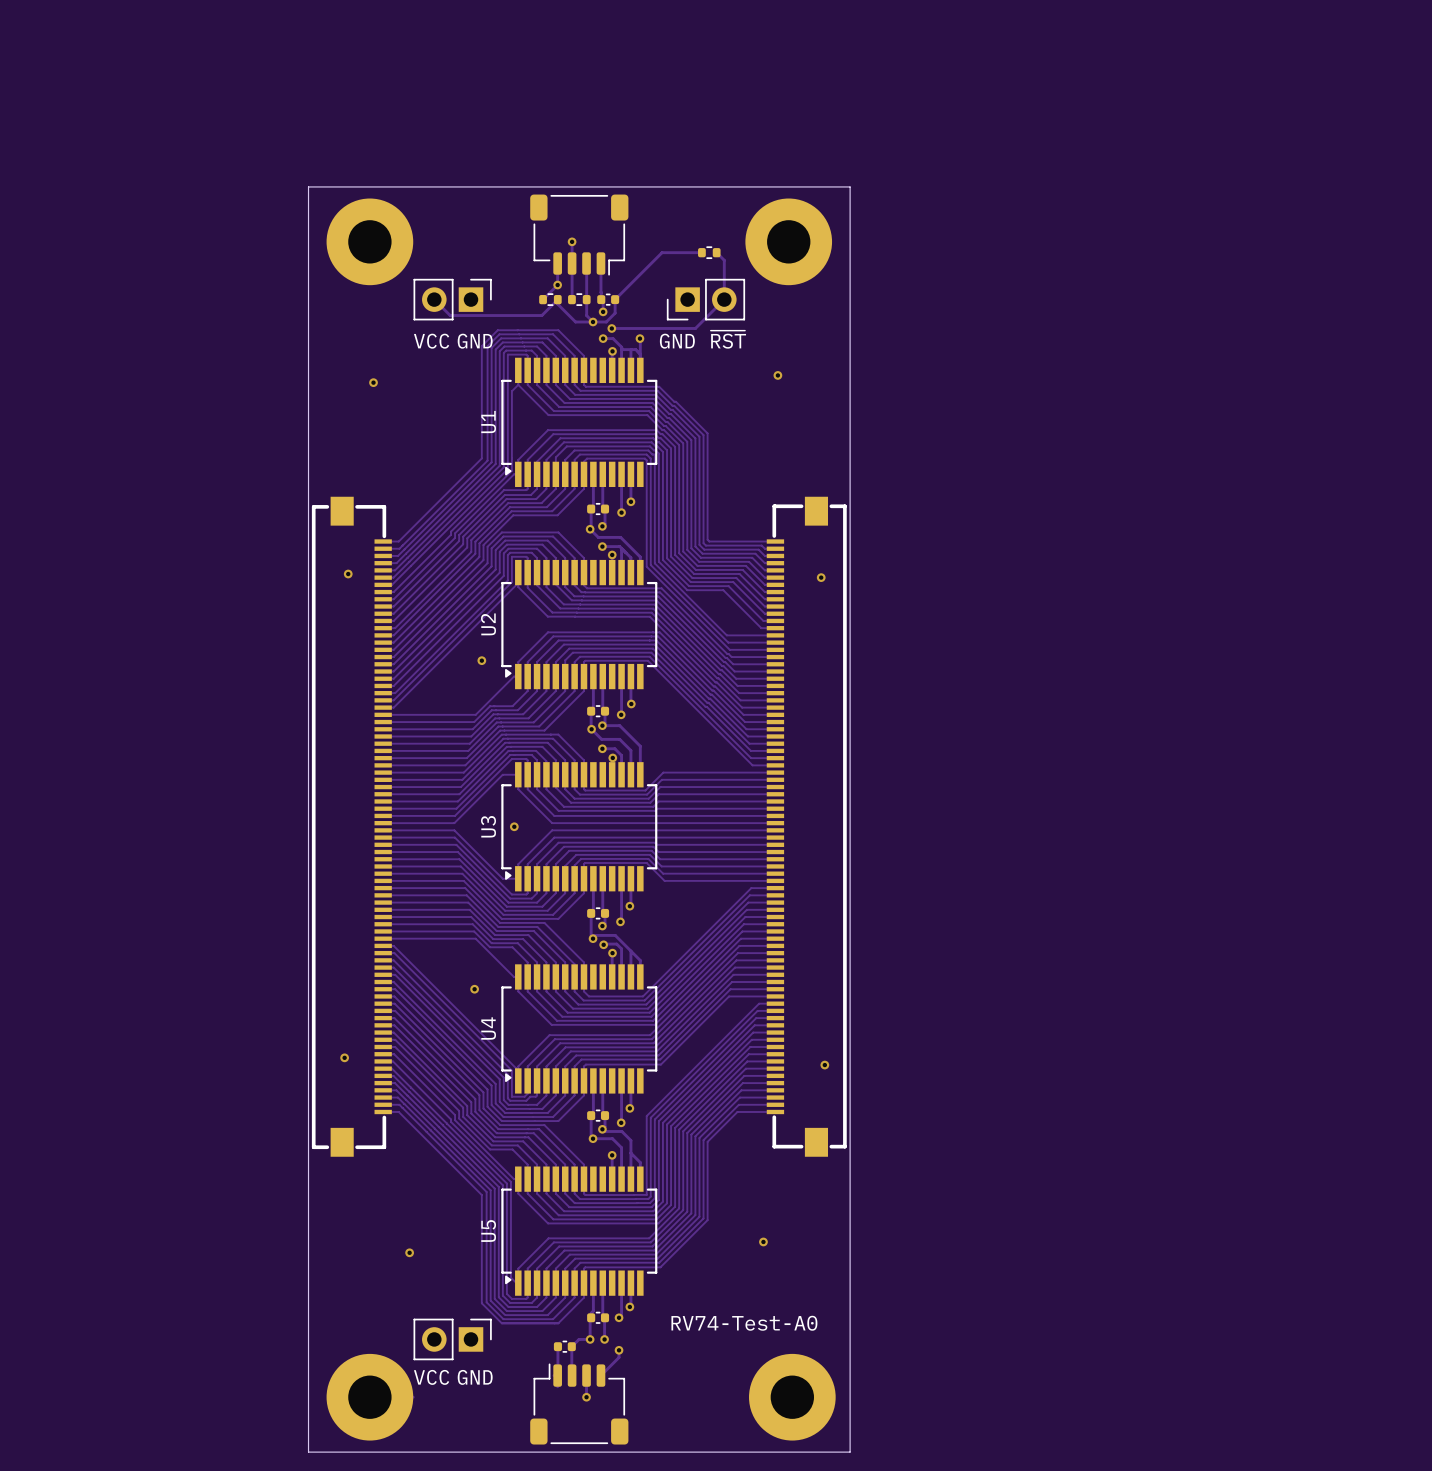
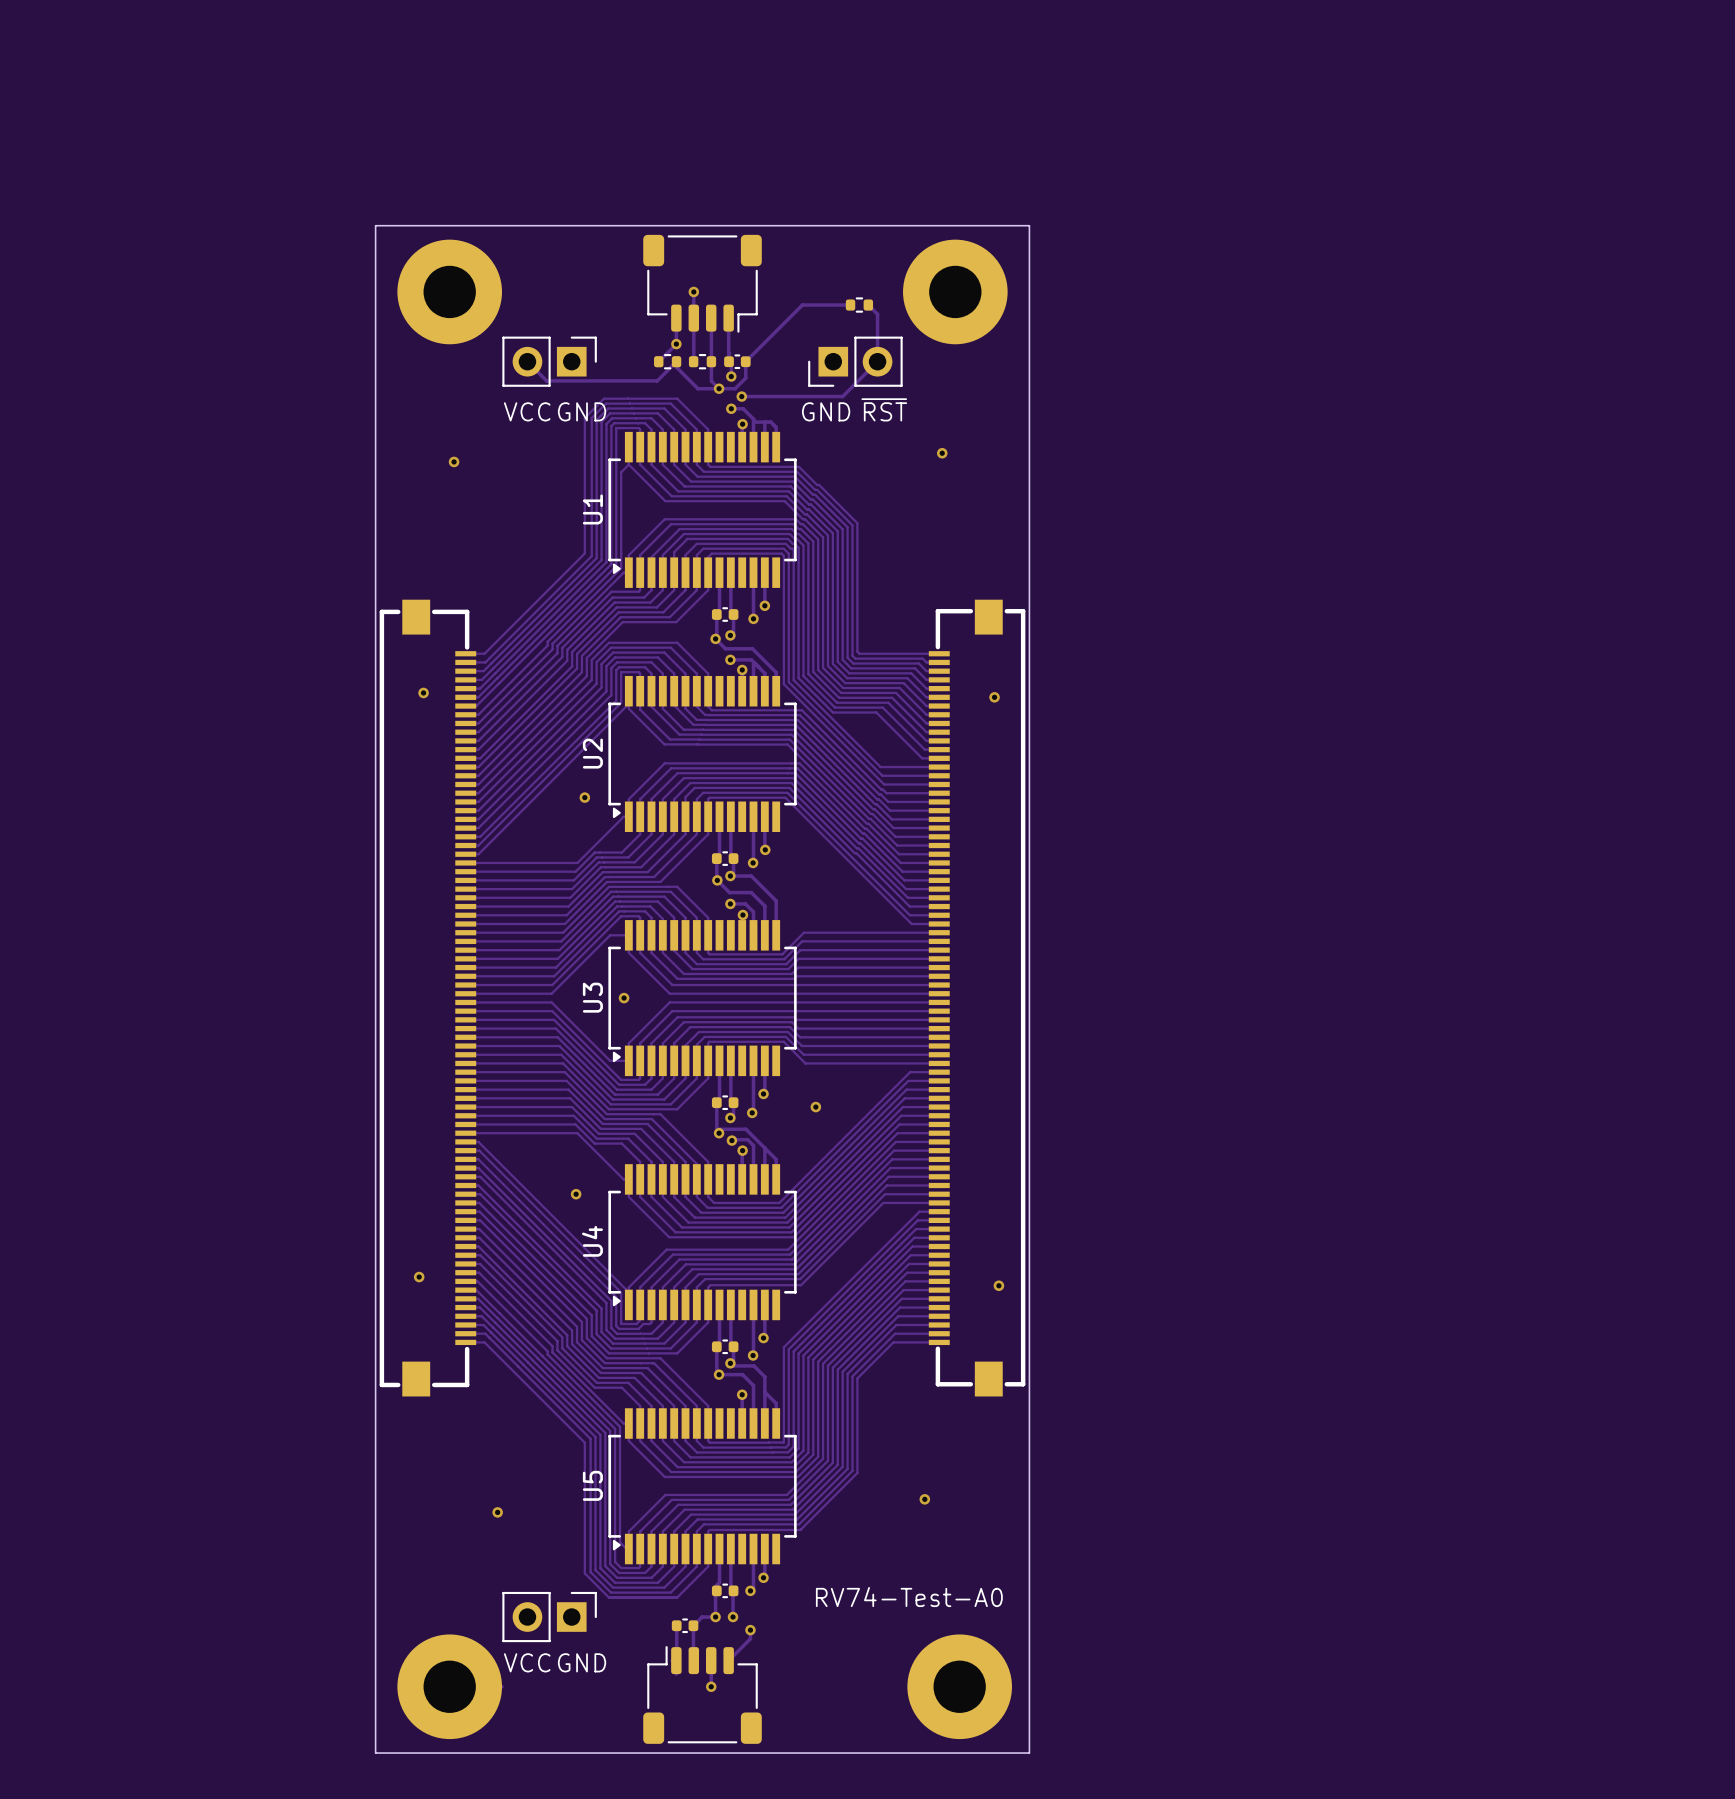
track: (639, 338) (640, 354) -> none
via: (639, 338) -> none
via: none -> (815, 1107)

